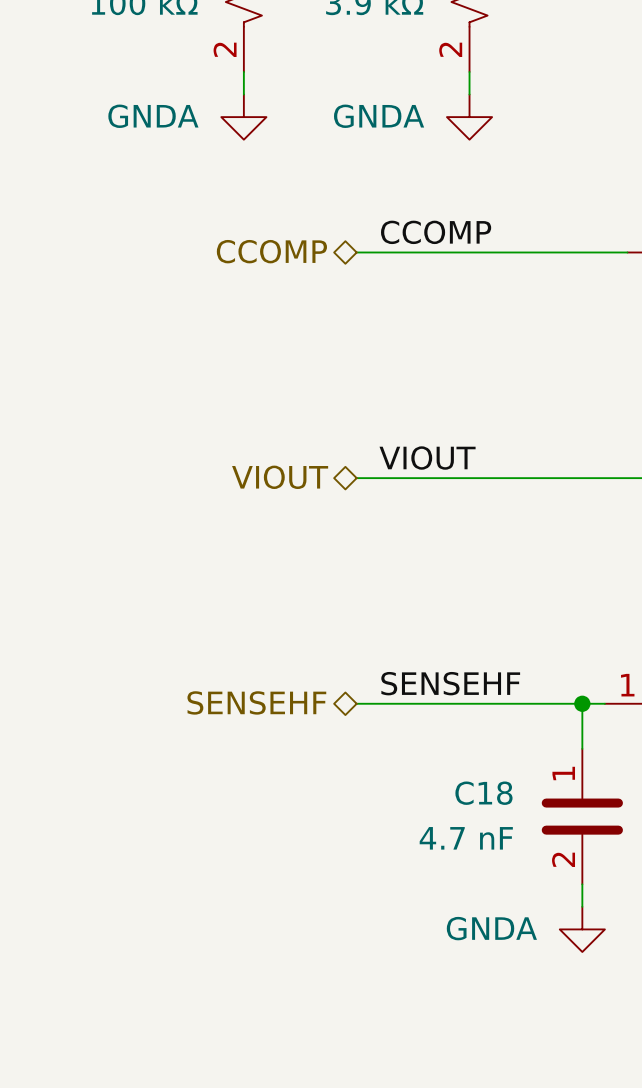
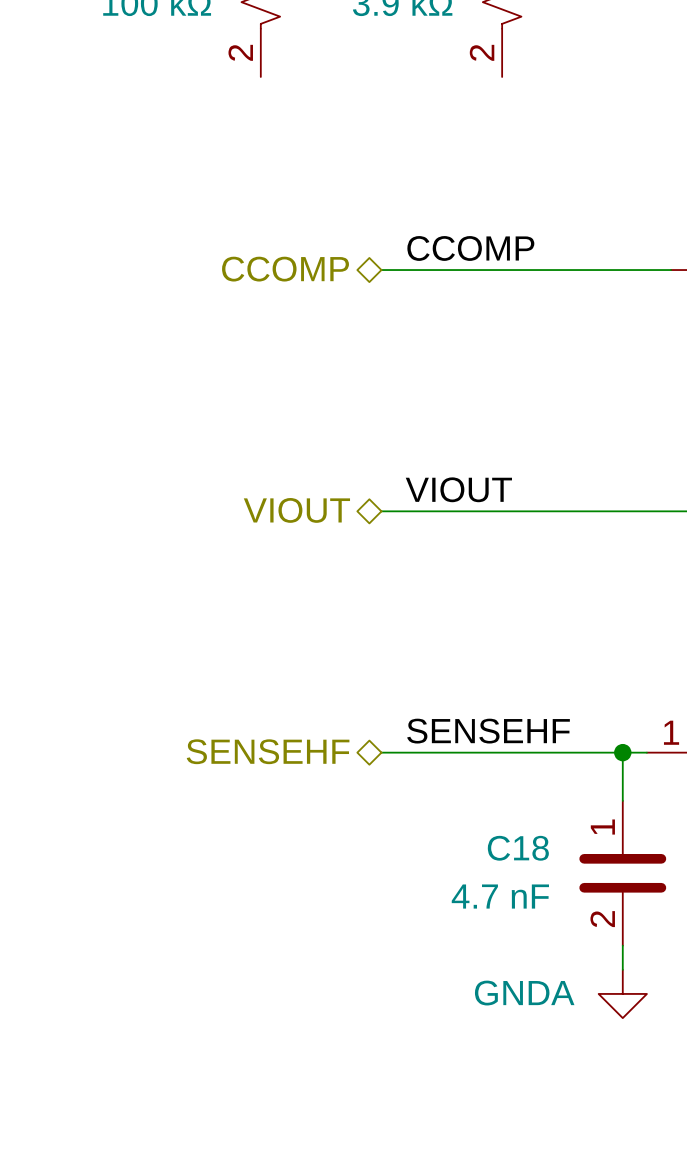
wire: (243, 71) (243, 94) -> none
wire: (469, 71) (469, 94) -> none
power symbol: GNDA (243, 117) -> none
power symbol: GNDA (469, 117) -> none

